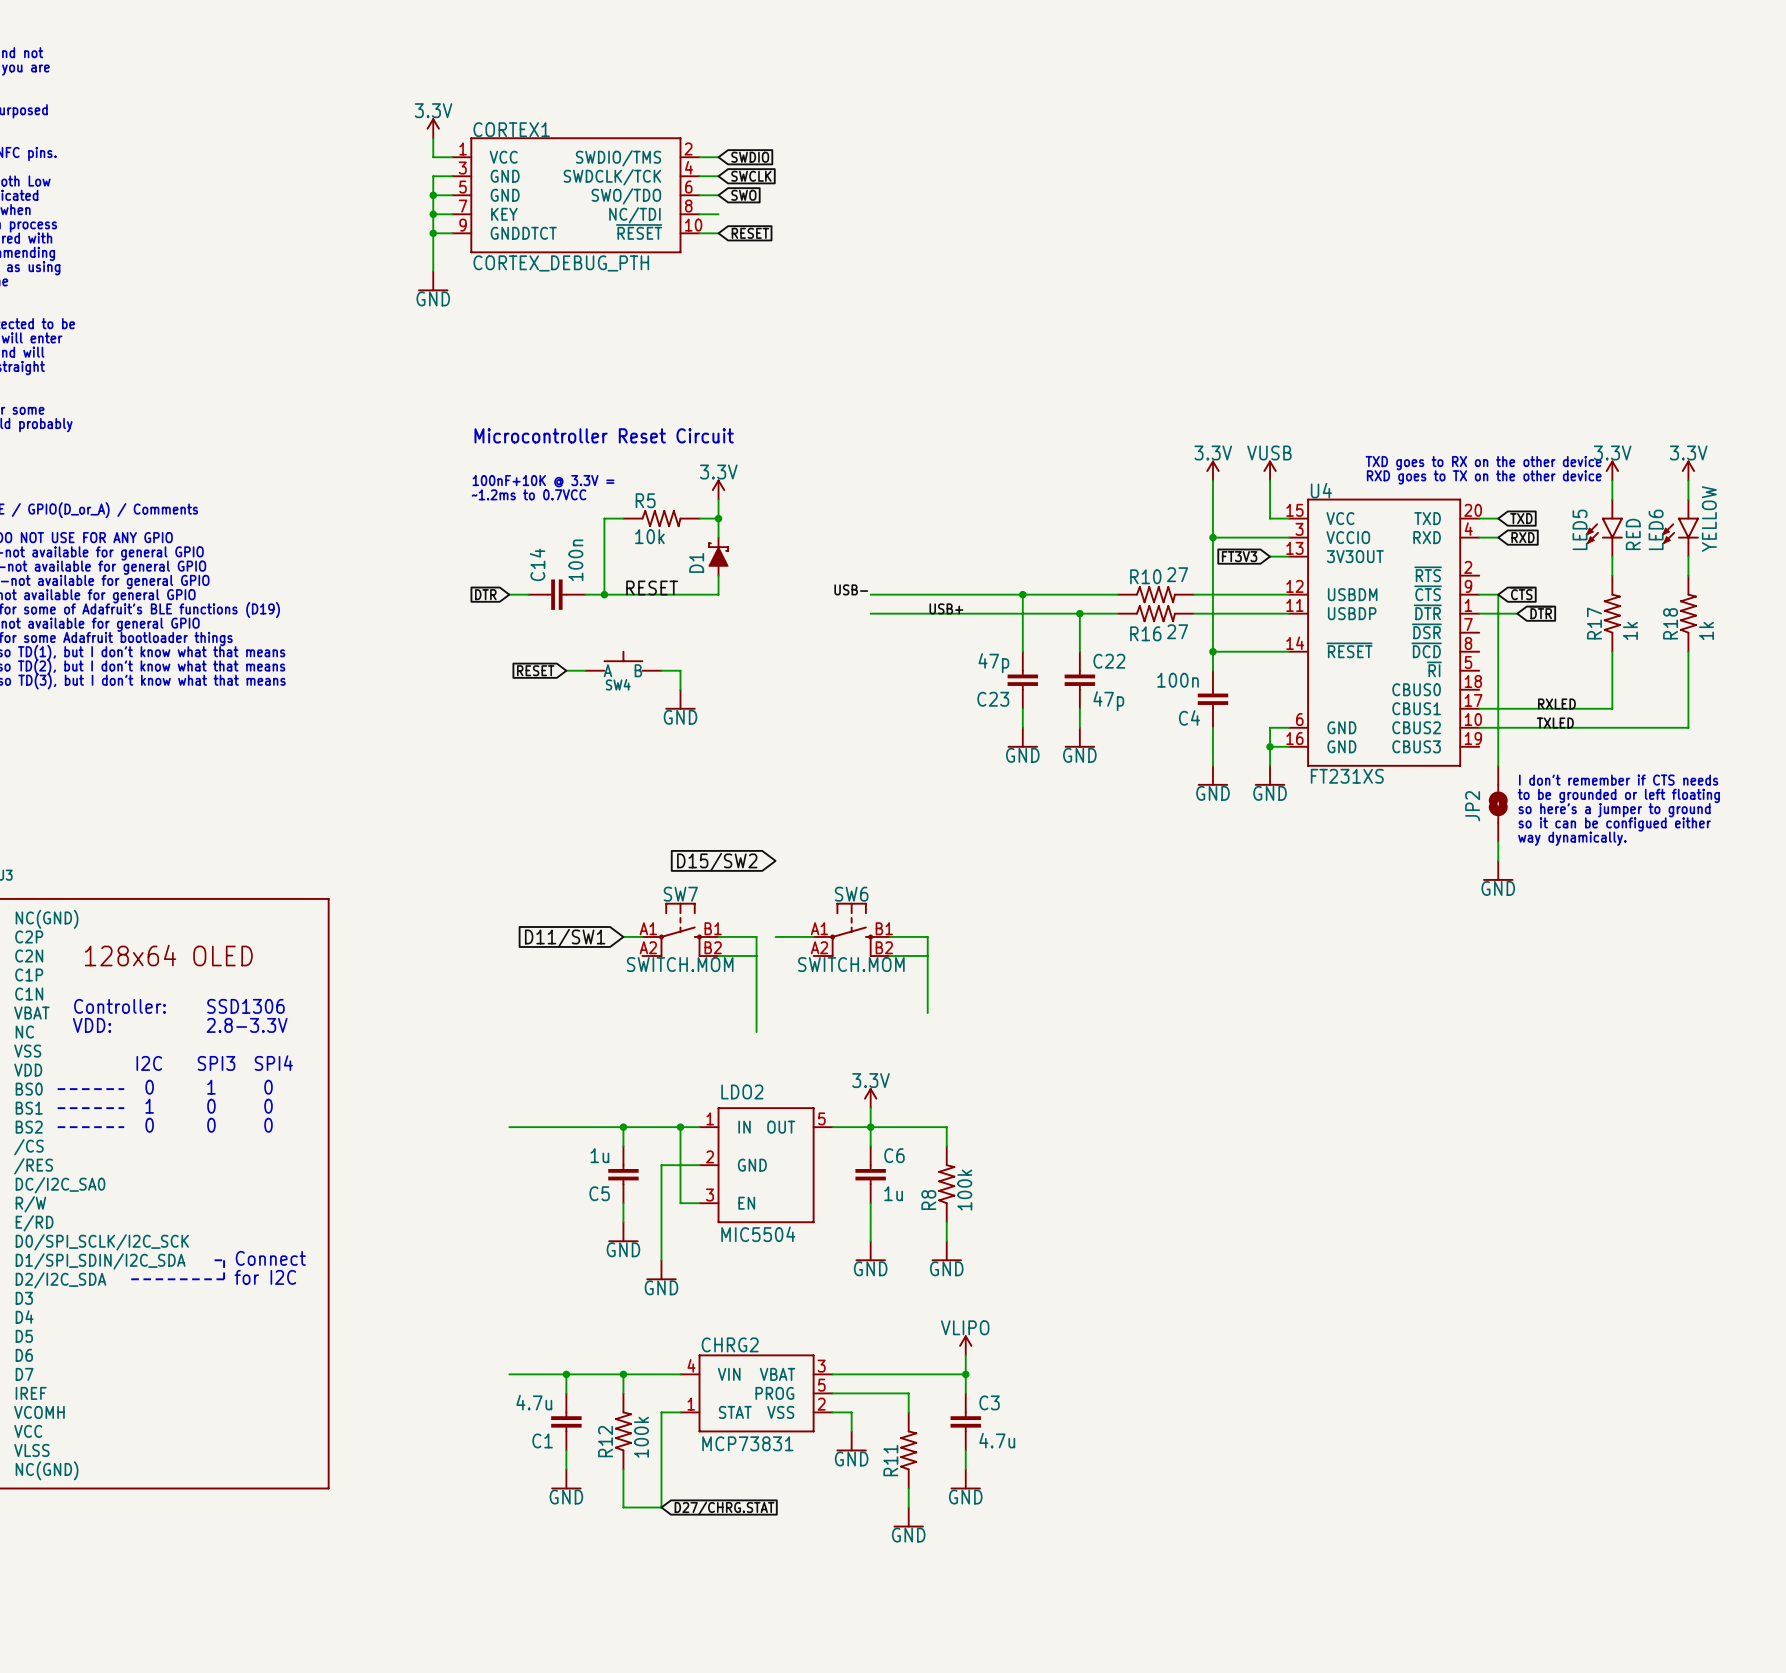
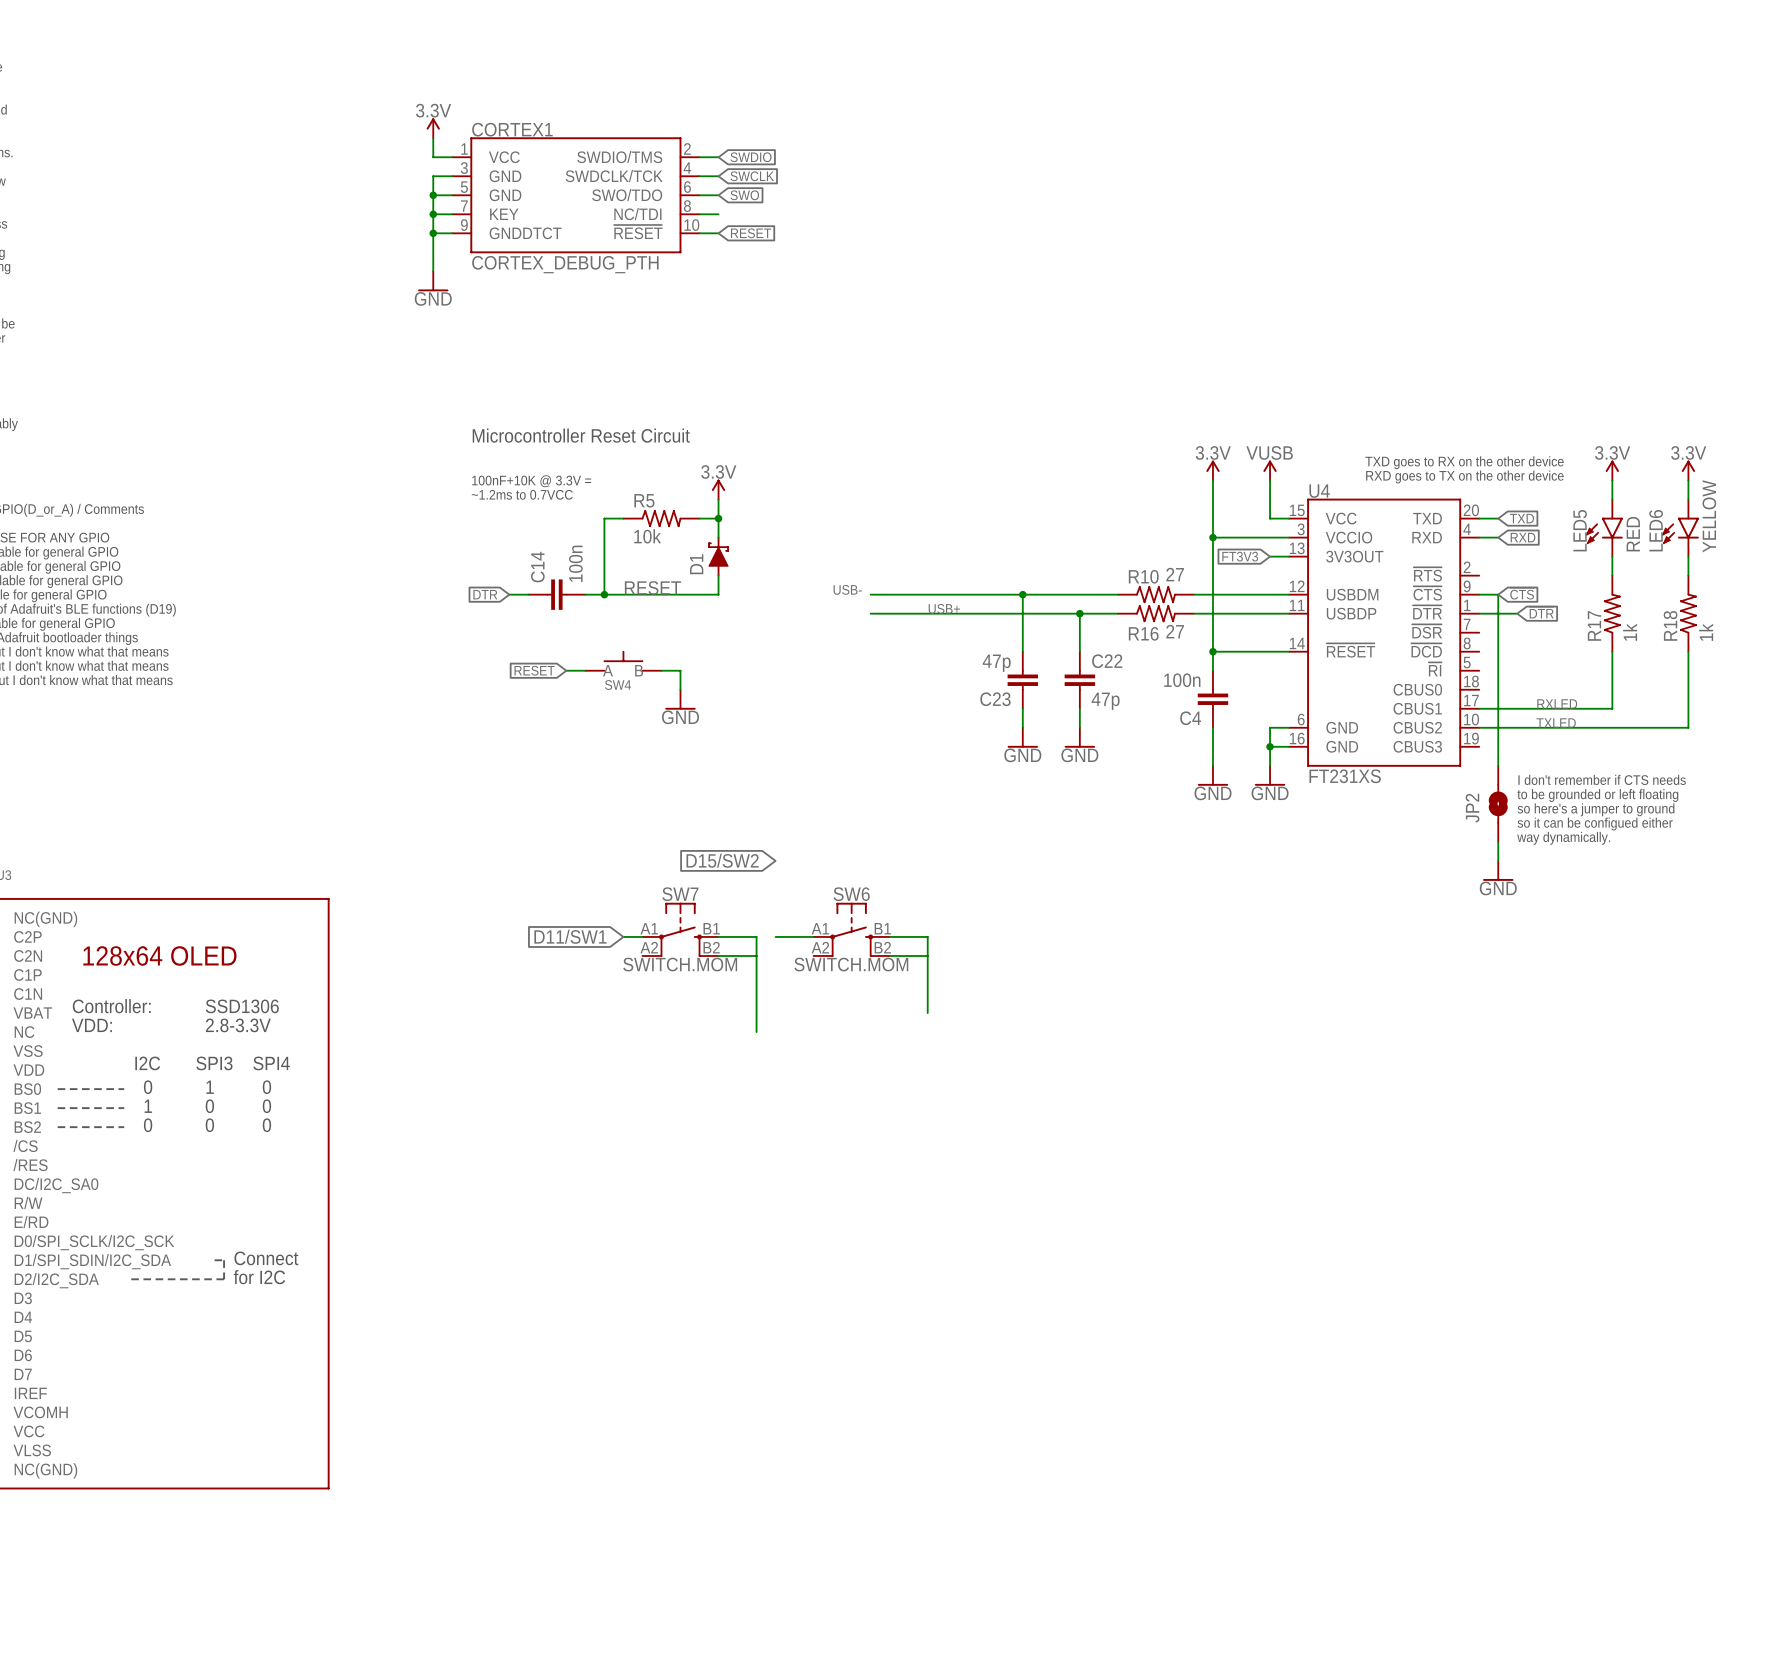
power symbol: 3.3V (870, 1098) -> none
wire: (870, 1108) (870, 1146) -> none
wire: (509, 1127) (699, 1127) -> none
wire: (623, 1127) (623, 1146) -> none
junction: (623, 1127) -> none
wire: (680, 1127) (680, 1203) (699, 1203) -> none
junction: (680, 1127) -> none
wire: (832, 1127) (946, 1127) (946, 1146) -> none
junction: (870, 1127) -> none
wire: (699, 1165) (661, 1165) (661, 1260) -> none
LDO2: MIC5504 (766, 1165) -> none
C5: 1u (623, 1174) -> none
C6: 1u (870, 1174) -> none
R8: 100k (946, 1184) -> none
wire: (623, 1203) (623, 1222) -> none
wire: (870, 1203) (870, 1241) -> none
wire: (946, 1222) (946, 1241) -> none
power symbol: GND (623, 1232) -> none
power symbol: GND (870, 1251) -> none
power symbol: GND (946, 1251) -> none
power symbol: GND (661, 1270) -> none
power symbol: VLIPO (965, 1345) -> none
wire: (965, 1355) (965, 1393) -> none
wire: (509, 1374) (680, 1374) -> none
wire: (566, 1374) (566, 1393) -> none
junction: (566, 1374) -> none
wire: (623, 1374) (623, 1393) -> none
junction: (623, 1374) -> none
wire: (832, 1374) (965, 1374) -> none
junction: (965, 1374) -> none
CHRG2: MCP73831 (756, 1393) -> none
wire: (832, 1393) (908, 1393) (908, 1412) -> none
wire: (680, 1412) (661, 1412) (661, 1507) (623, 1507) (623, 1469) -> none
wire: (832, 1412) (851, 1412) (851, 1431) -> none
C1: 4.7u (566, 1421) -> none
C3: 4.7u (965, 1421) -> none
R12: 100k (623, 1431) -> none
power symbol: GND (851, 1441) -> none
wire: (566, 1450) (566, 1469) -> none
R11: (908, 1450) -> none
wire: (965, 1450) (965, 1469) -> none
power symbol: GND (566, 1479) -> none
power symbol: GND (965, 1479) -> none
wire: (908, 1488) (908, 1507) -> none
global label: D27/CHRG.STAT (724, 1508) -> none
power symbol: GND (908, 1517) -> none

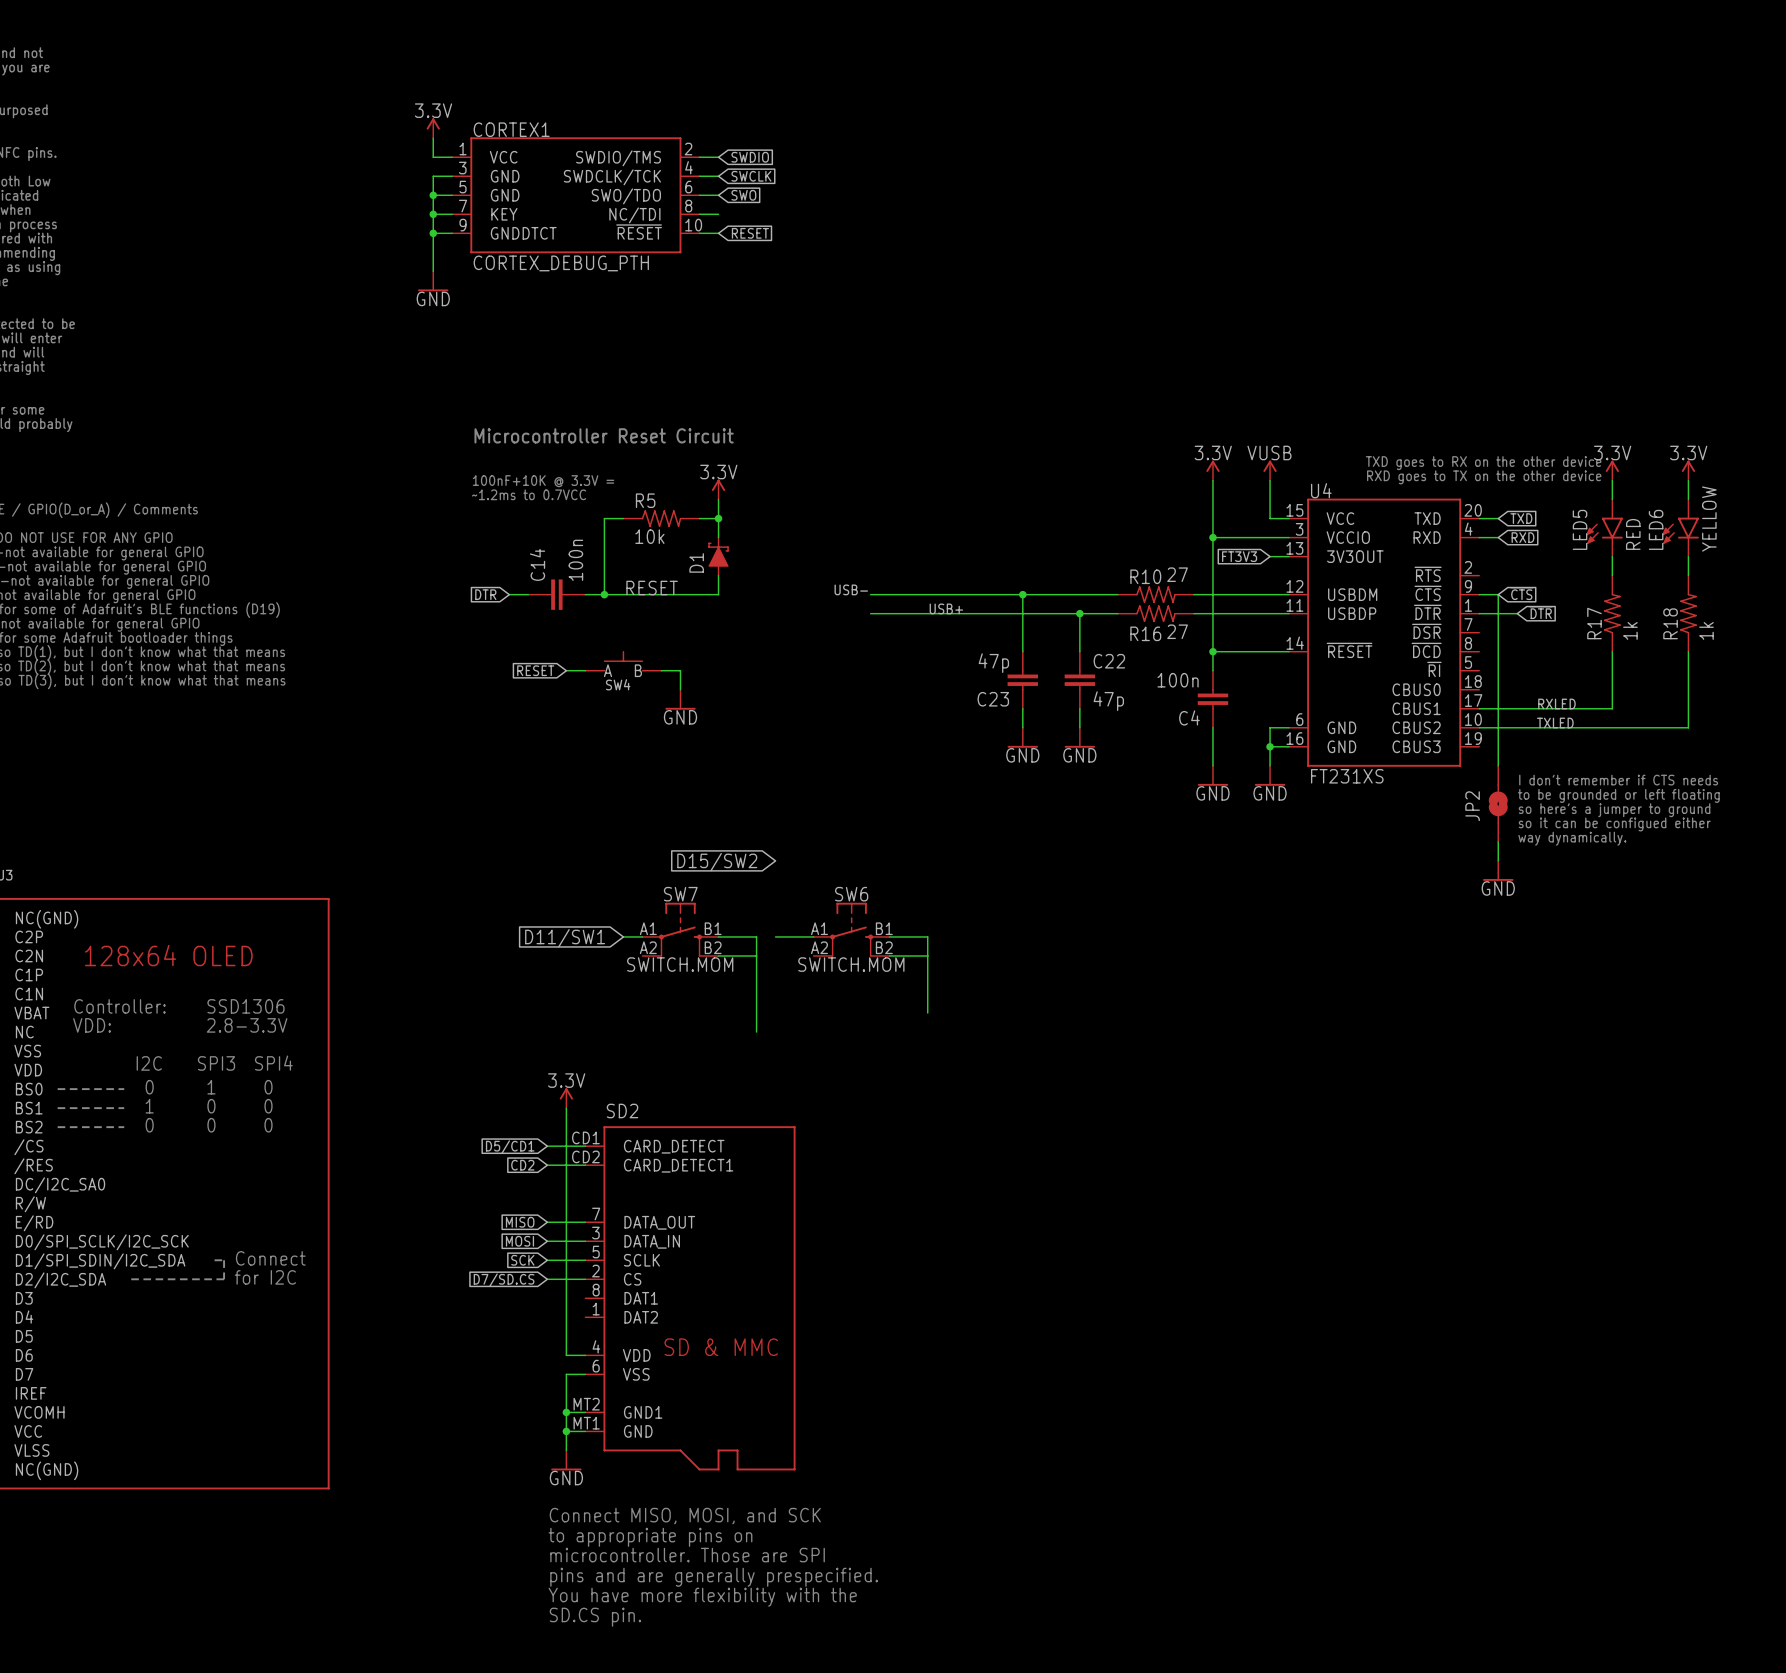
power symbol: none -> 3.3V (566, 1098)
wire: none -> (566, 1108) (566, 1355) (585, 1355)
global label: none -> D5/CD1 (510, 1147)
wire: none -> (547, 1146) (585, 1146)
global label: none -> CD2 (522, 1165)
wire: none -> (547, 1165) (585, 1165)
global label: none -> MISO (520, 1222)
wire: none -> (547, 1222) (585, 1222)
global label: none -> MOSI (519, 1241)
wire: none -> (547, 1241) (585, 1241)
global label: none -> SCK (522, 1260)
wire: none -> (547, 1260) (585, 1260)
global label: none -> D7/SD.CS (504, 1280)
wire: none -> (547, 1279) (585, 1279)
SD2: none -> (690, 1298)
wire: none -> (585, 1374) (566, 1374) (566, 1450)
wire: none -> (566, 1412) (585, 1412)
junction: none -> (566, 1412)
wire: none -> (566, 1431) (585, 1431)
junction: none -> (566, 1431)
power symbol: none -> GND (566, 1460)
text: none -> Connect MISO, MOSI, and SCK (685, 1516)
text: none -> to appropriate pins on (650, 1537)
text: none -> microcontroller. Those are SPI (687, 1555)
text: none -> pins and are generally prespecified. (714, 1577)
text: none -> You have more flexibility with the (702, 1597)
text: none -> SD.CS pin. (595, 1617)

